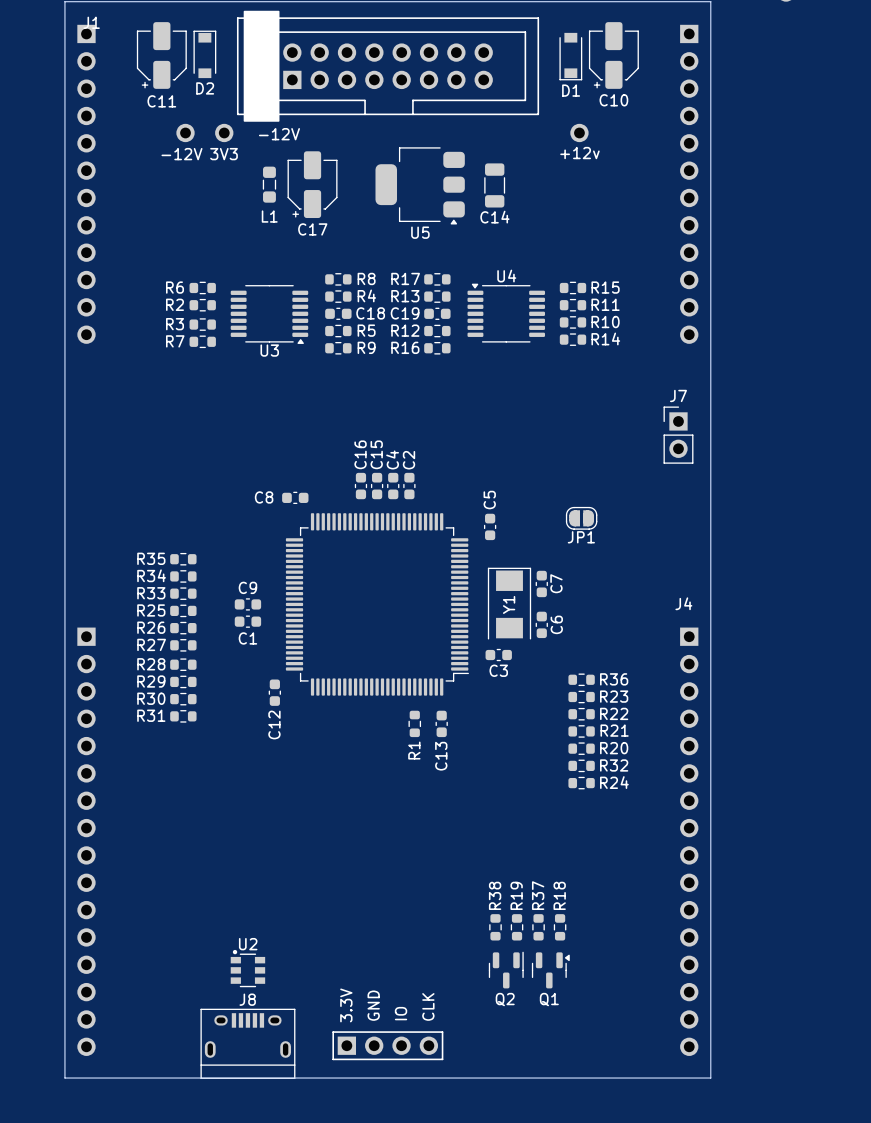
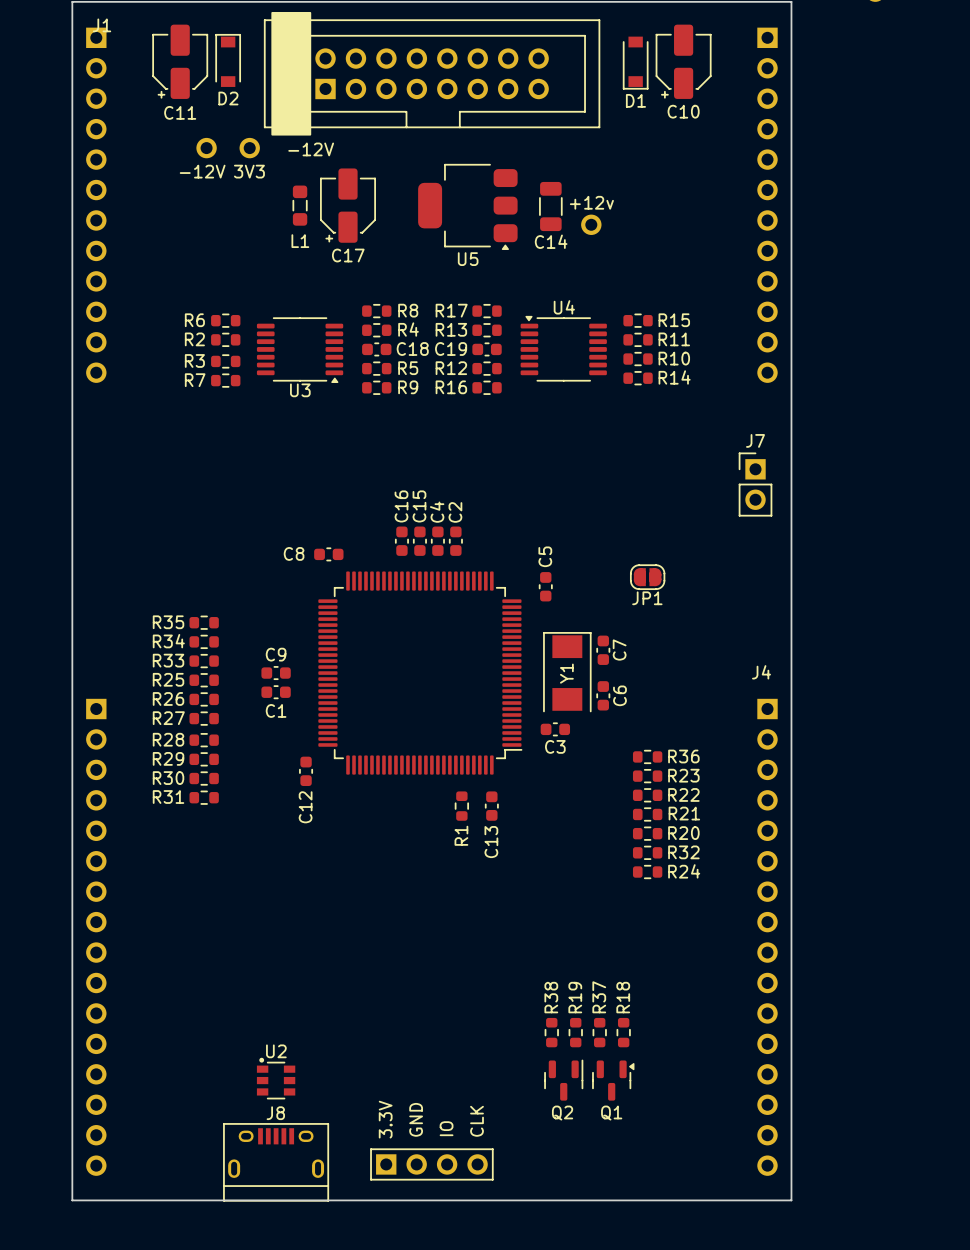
part: (579, 132) -> none
part: none -> (591, 224)

